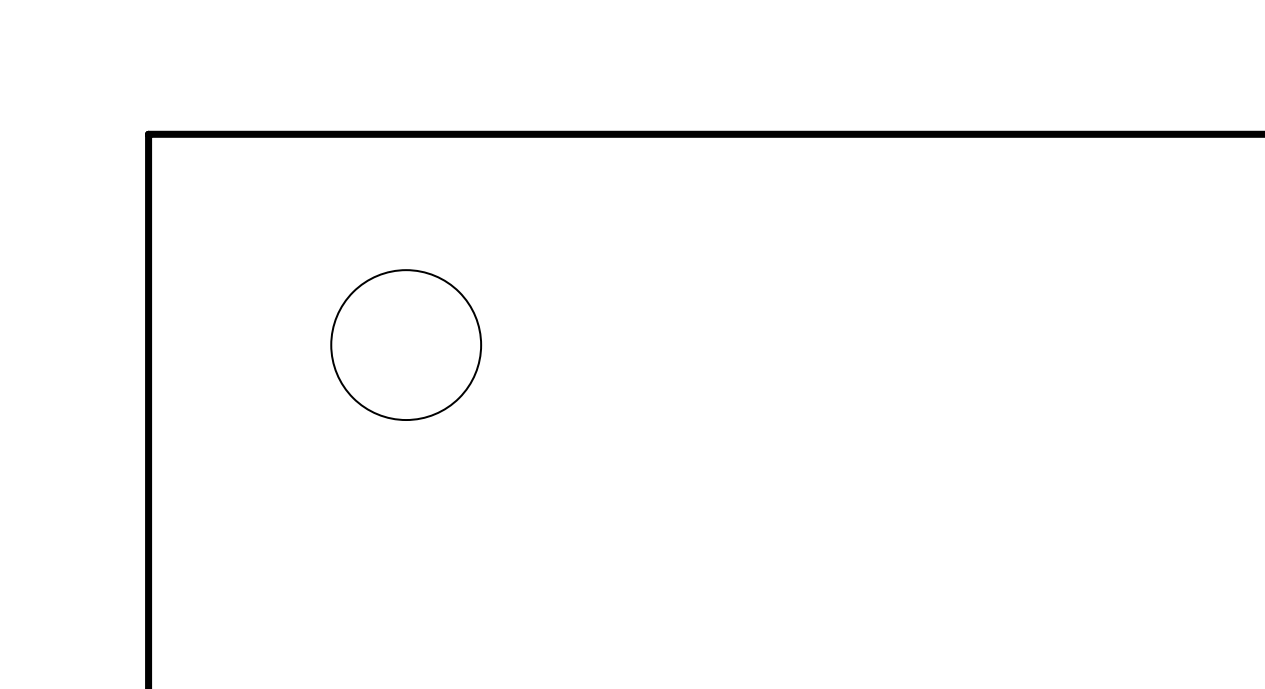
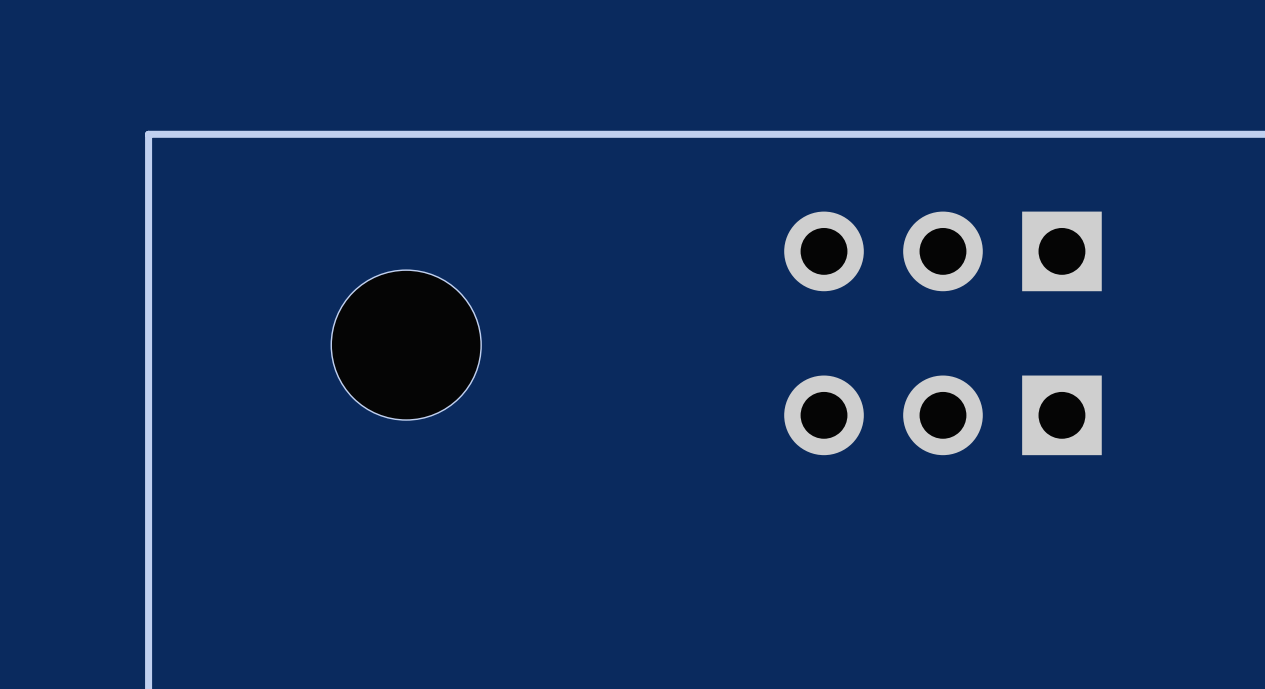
part: none -> (942, 251)
part: none -> (942, 415)

